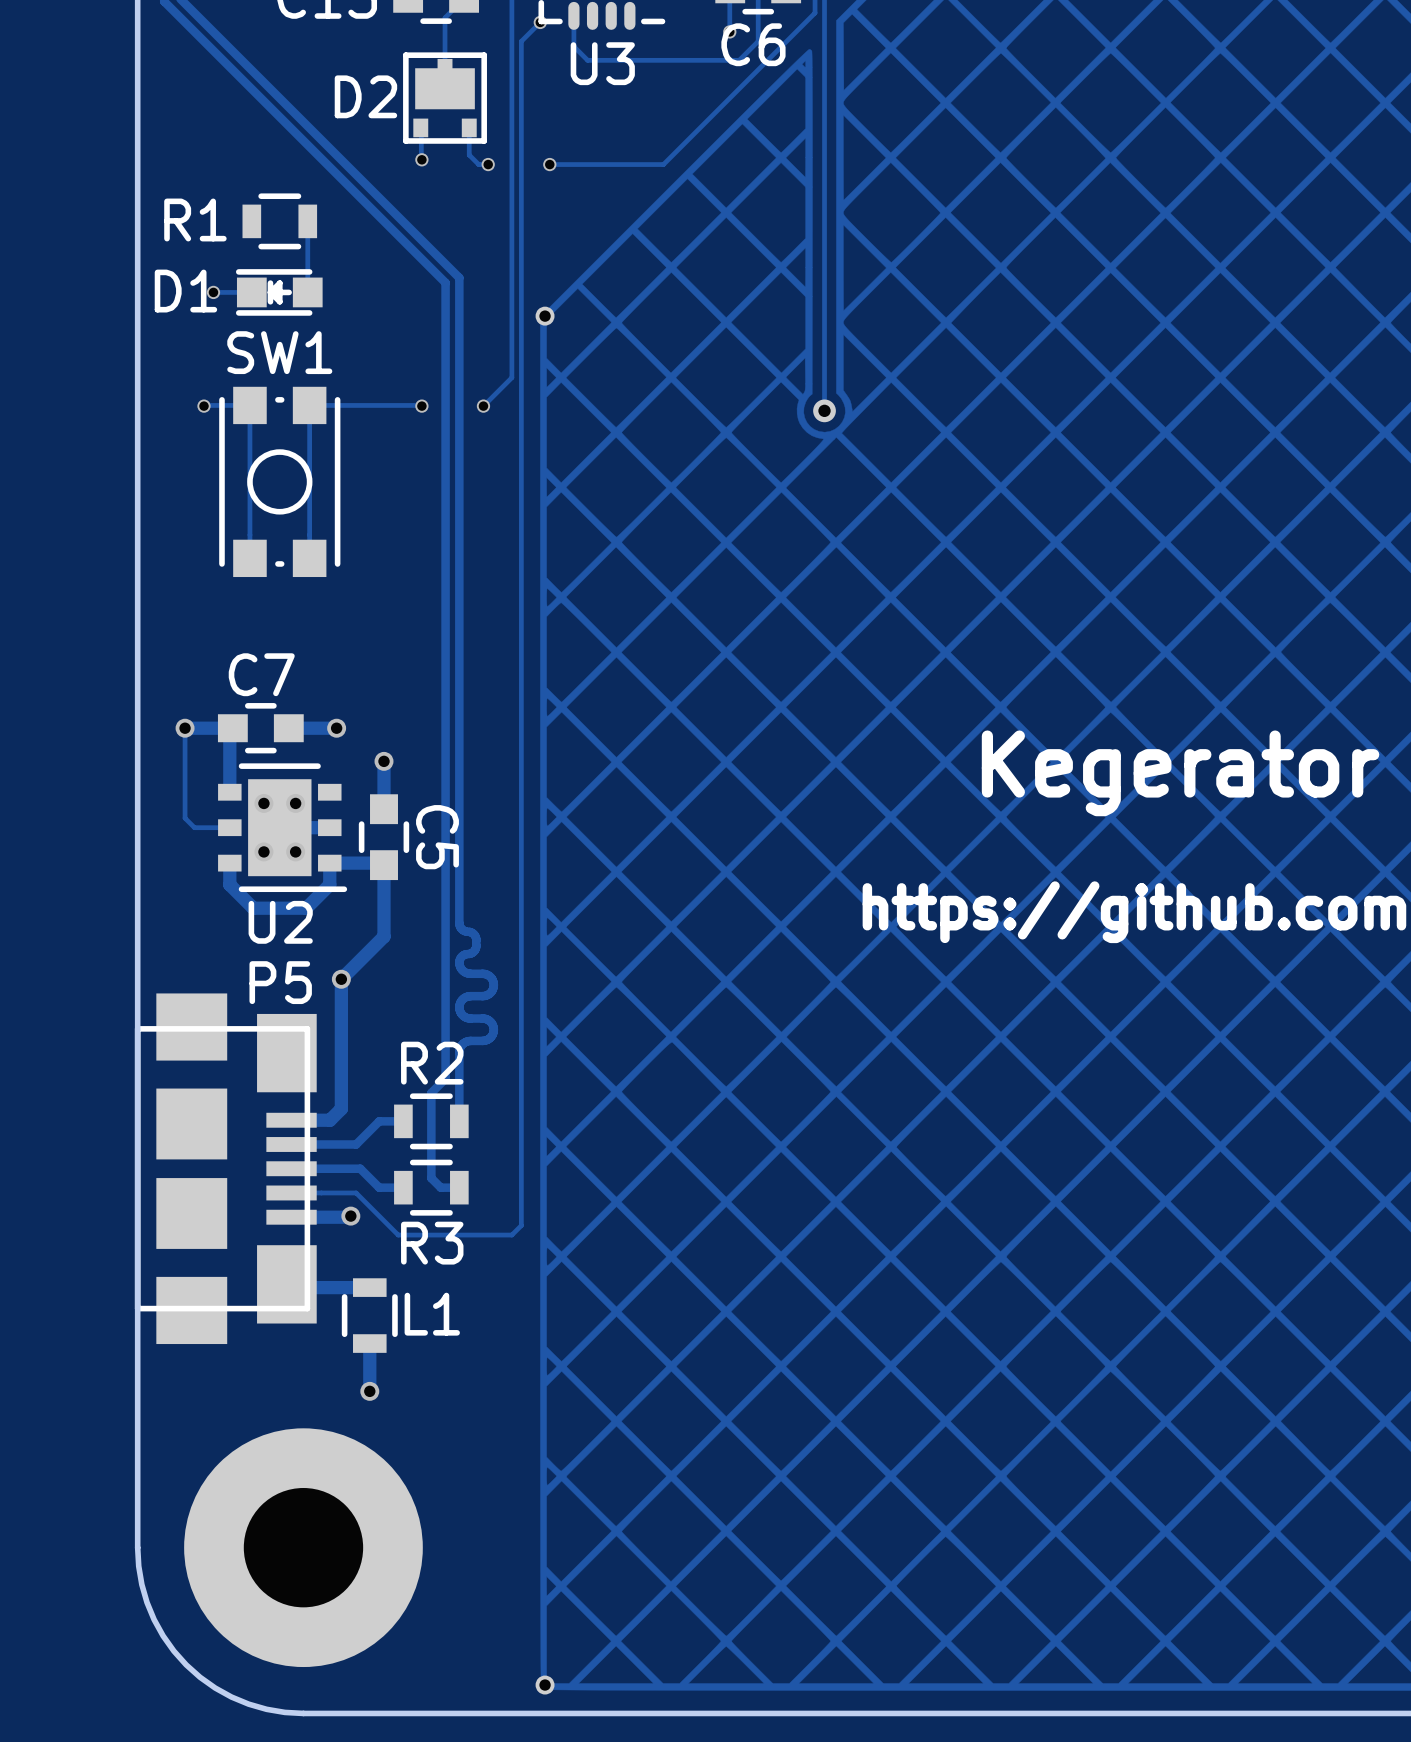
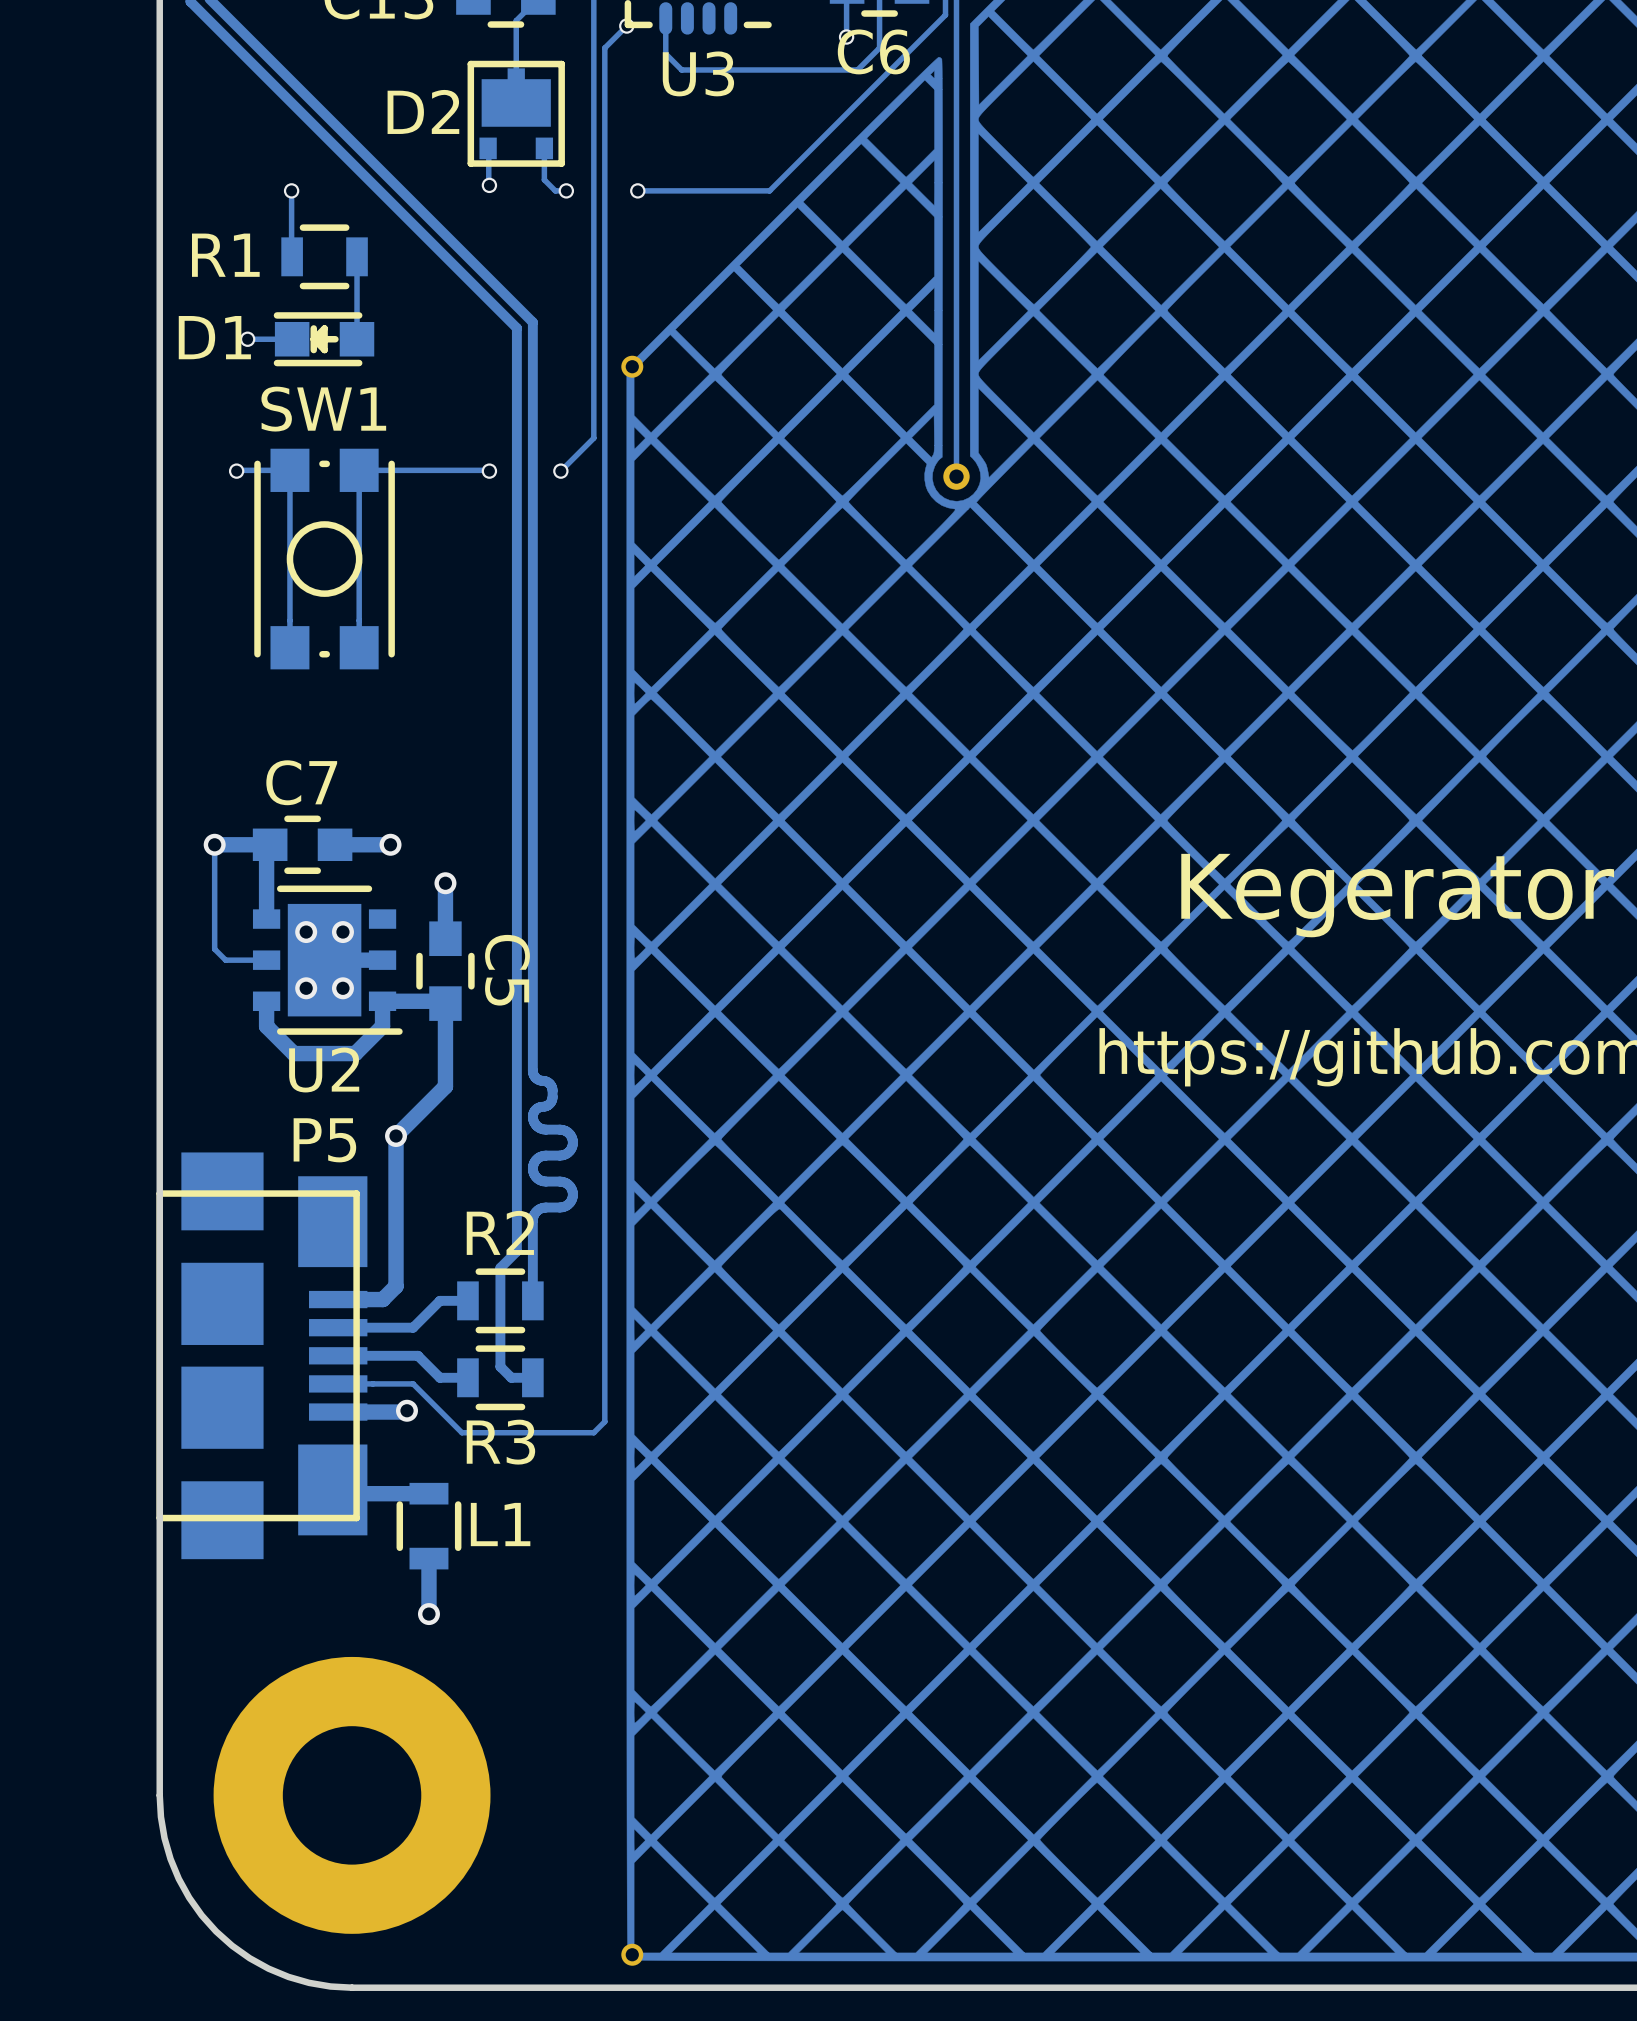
track: none -> (291, 190) (291, 256)
via: none -> (291, 190)

